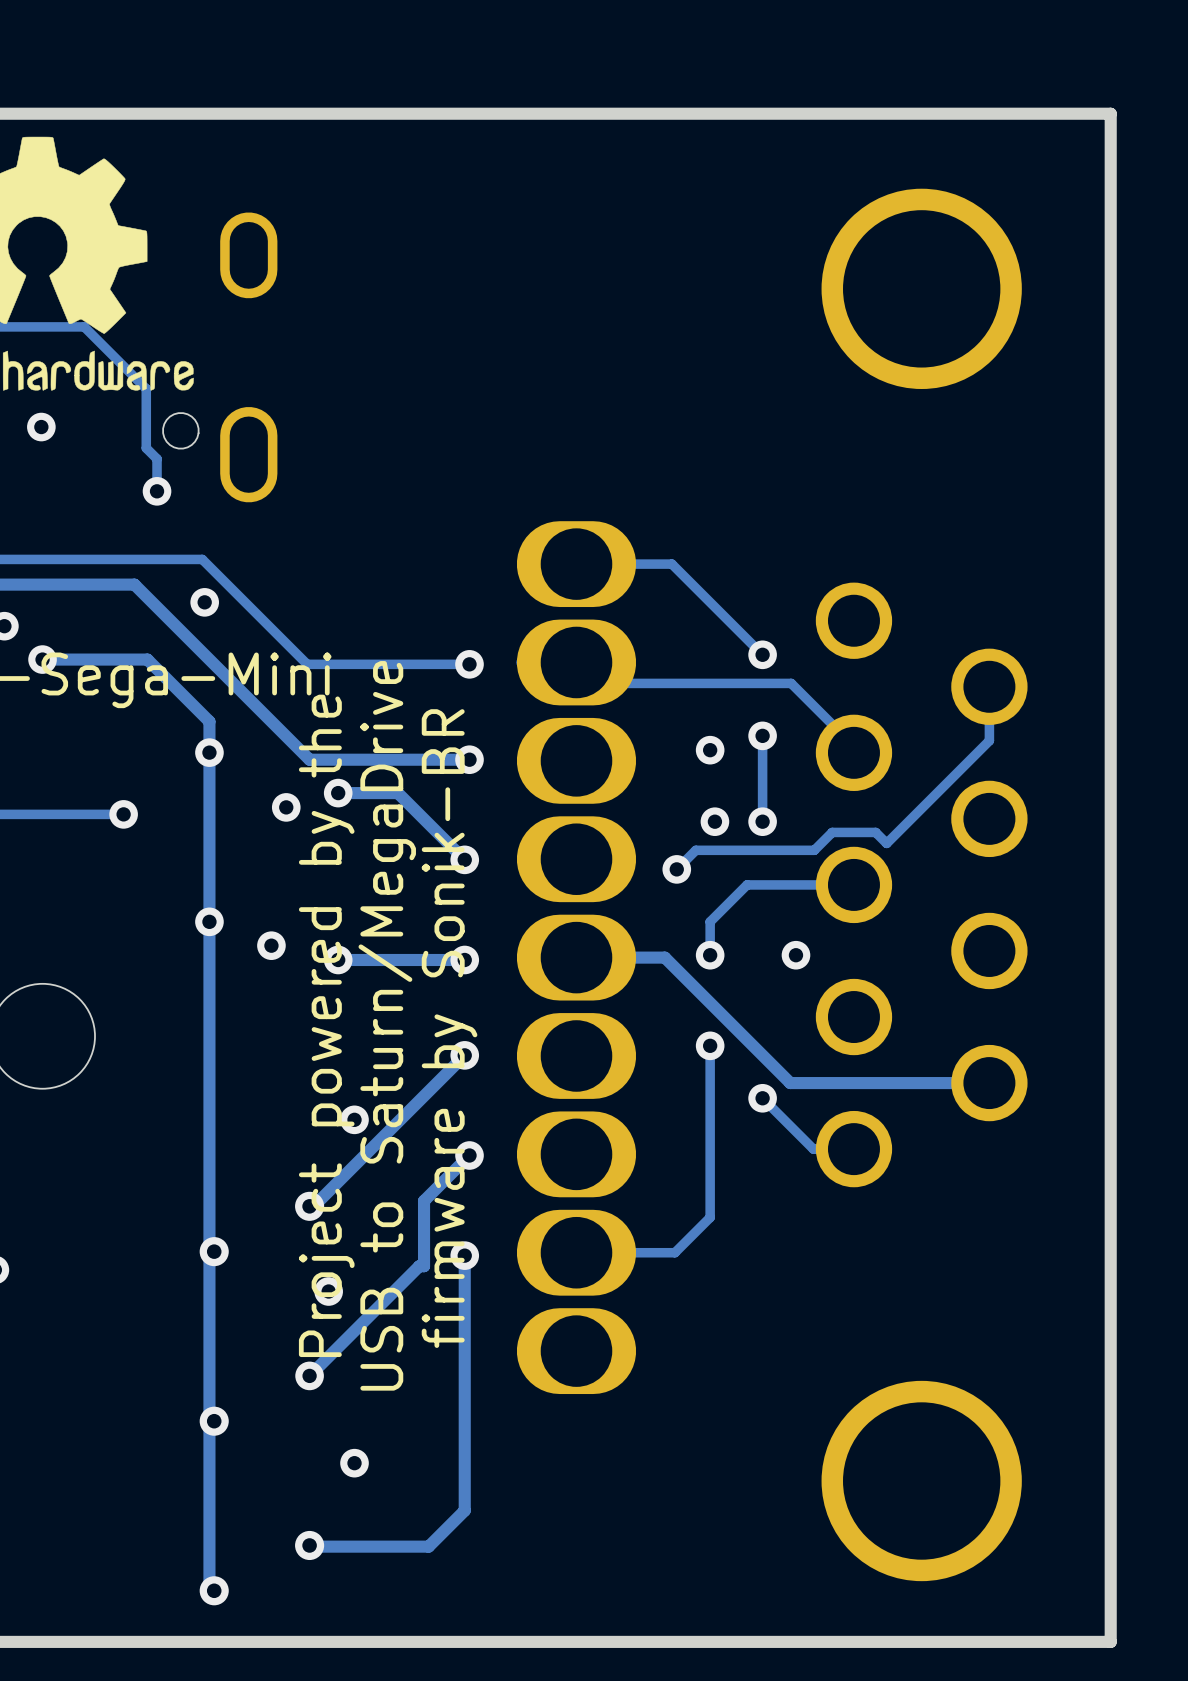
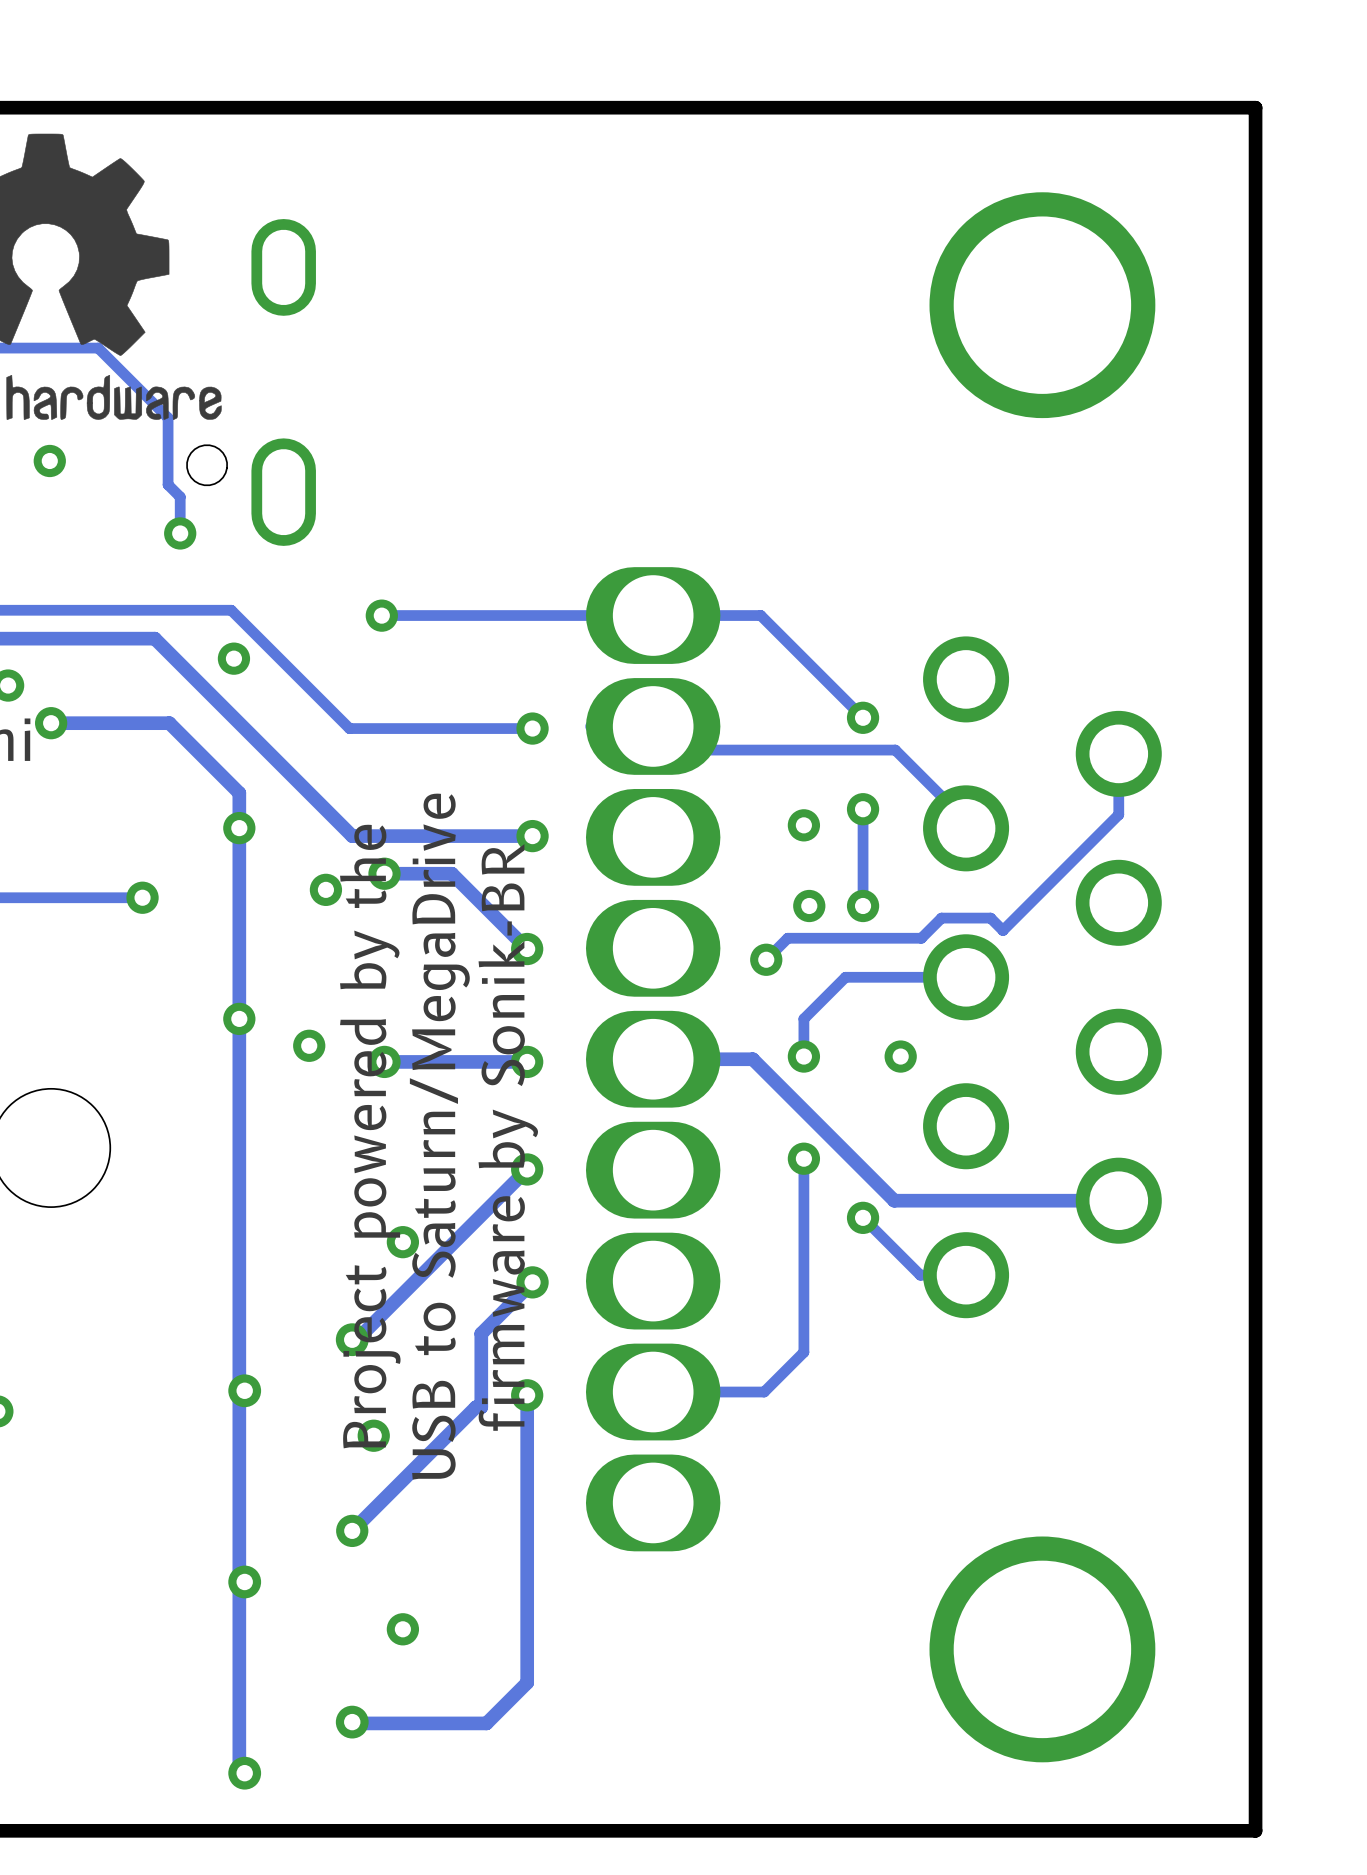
via: none -> (381, 615)
track: none -> (653, 615) (381, 615)

